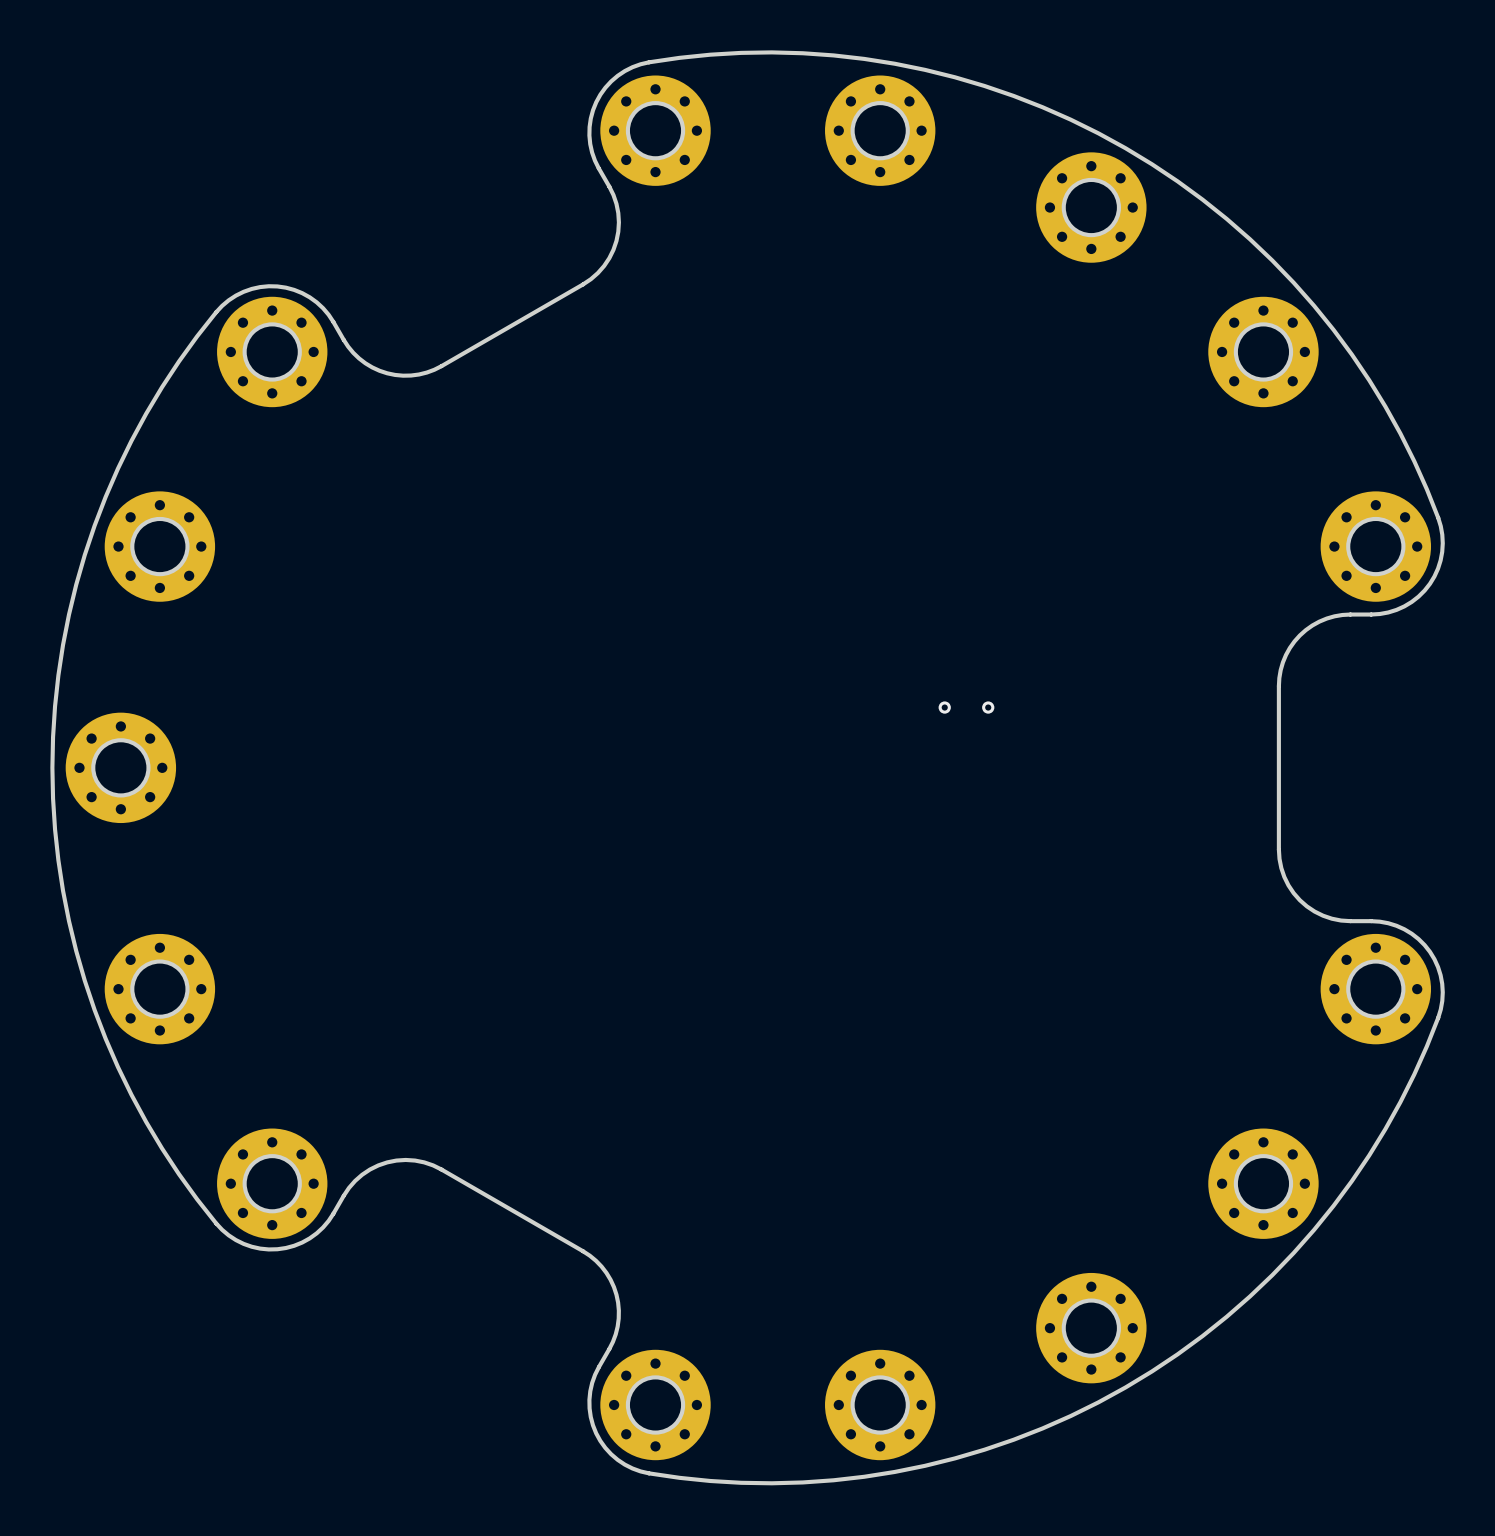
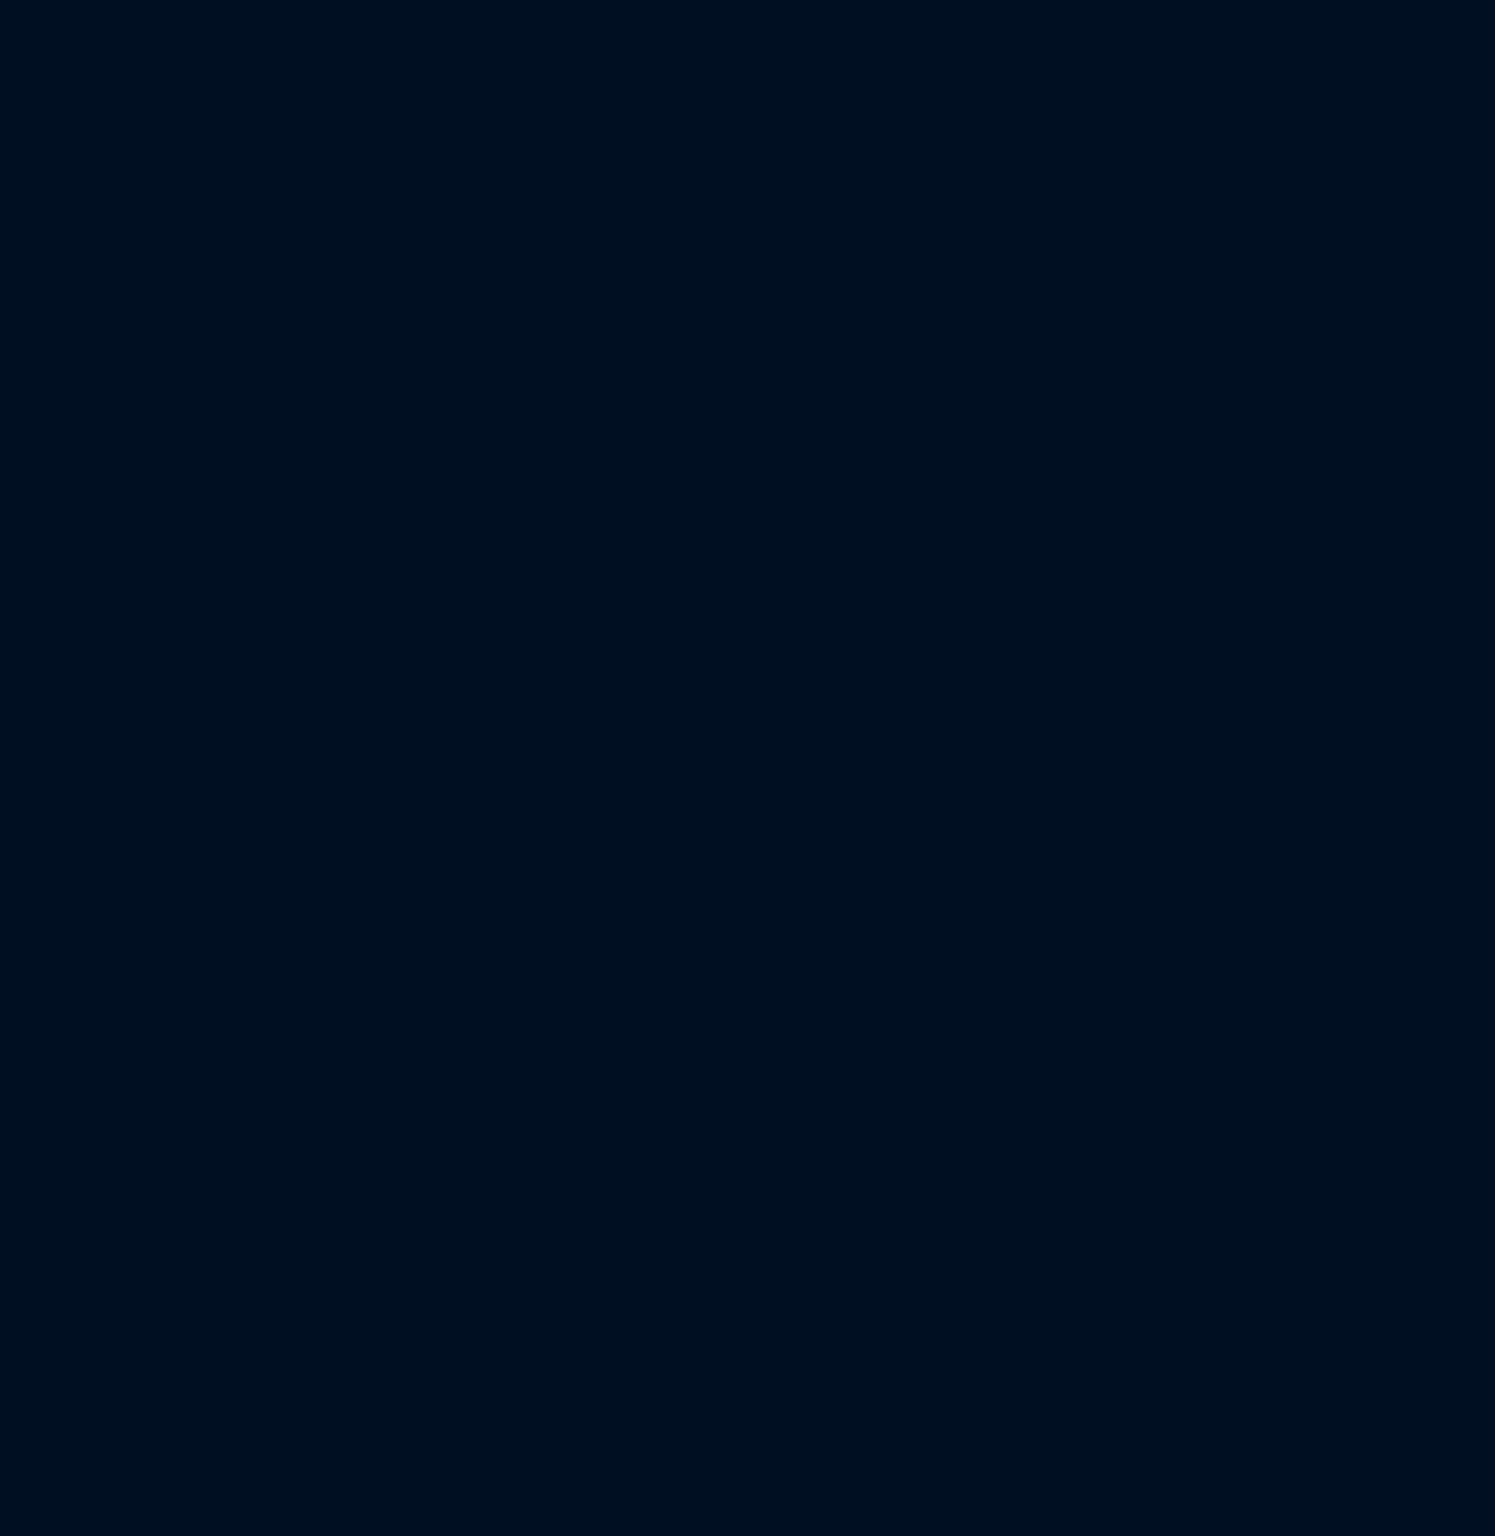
board edge: (649, 62) (710, 54) (771, 52) (833, 55) (894, 63) (955, 77) (1013, 96) (1070, 119) (1125, 148) (1177, 181) (1226, 218) (1272, 260) (1314, 305) (1351, 354) (1385, 406) (1426, 489) (1438, 518) (1442, 534) (1442, 551) (1438, 568) (1429, 583) (1418, 596) (1404, 606) (1388, 612) (1334, 616) (1312, 625) (1299, 635) (1289, 648) (1282, 662) (1279, 678) (1278, 849) (1281, 868) (1288, 885) (1306, 906) (1323, 915) (1341, 920) (1379, 921) (1404, 929) (1424, 945) (1434, 959) (1440, 975) (1442, 992) (1438, 1017) (1414, 1074) (1385, 1129) (1351, 1181) (1293, 1252) (1226, 1316) (1177, 1354) (1125, 1387) (1042, 1428) (984, 1449) (894, 1471) (802, 1482) (741, 1482) (649, 1473) (624, 1464) (611, 1454) (600, 1440) (592, 1425) (589, 1408) (592, 1382) (612, 1341) (618, 1318) (616, 1294) (606, 1272) (596, 1260) (583, 1251) (433, 1165) (415, 1160) (396, 1160) (369, 1169) (348, 1187) (323, 1227) (309, 1238) (294, 1245) (277, 1249) (260, 1248) (243, 1243) (228, 1235) (216, 1223) (197, 1199) (162, 1148) (117, 1067) (84, 980) (63, 890) (55, 829) (52, 767) (58, 675) (68, 614) (94, 525) (117, 468) (146, 413) (179, 361) (222, 305) (243, 291) (260, 287) (285, 287) (309, 297) (328, 314) (348, 346) (359, 358) (379, 370) (403, 375) (426, 372) (441, 366) (583, 284) (597, 273) (609, 258) (616, 240) (618, 222) (613, 195) (592, 152) (589, 127) (593, 110) (605, 87) (617, 75) (632, 67) (649, 62) -> none
round board edge: [625, 101, 686, 161] -> none
round board edge: [850, 101, 910, 161] -> none
part: (655, 130) -> none
part: (880, 130) -> none
round board edge: [1061, 177, 1121, 238] -> none
part: (1091, 207) -> none
round board edge: [242, 322, 302, 382] -> none
round board edge: [1233, 322, 1294, 382] -> none
part: (272, 351) -> none
part: (1263, 351) -> none
round board edge: [130, 516, 190, 577] -> none
round board edge: [1346, 516, 1406, 577] -> none
part: (159, 546) -> none
part: (1375, 546) -> none
via: (944, 707) -> none
via: (988, 707) -> none
round board edge: [91, 738, 151, 798] -> none
part: (120, 767) -> none
round board edge: [130, 959, 190, 1019] -> none
round board edge: [1346, 959, 1406, 1019] -> none
part: (159, 989) -> none
part: (1375, 989) -> none
round board edge: [242, 1154, 302, 1214] -> none
round board edge: [1233, 1154, 1294, 1214] -> none
part: (272, 1183) -> none
part: (1263, 1183) -> none
round board edge: [1061, 1298, 1121, 1358] -> none
part: (1091, 1328) -> none
round board edge: [625, 1375, 686, 1435] -> none
round board edge: [850, 1375, 910, 1435] -> none
part: (655, 1404) -> none
part: (880, 1404) -> none

